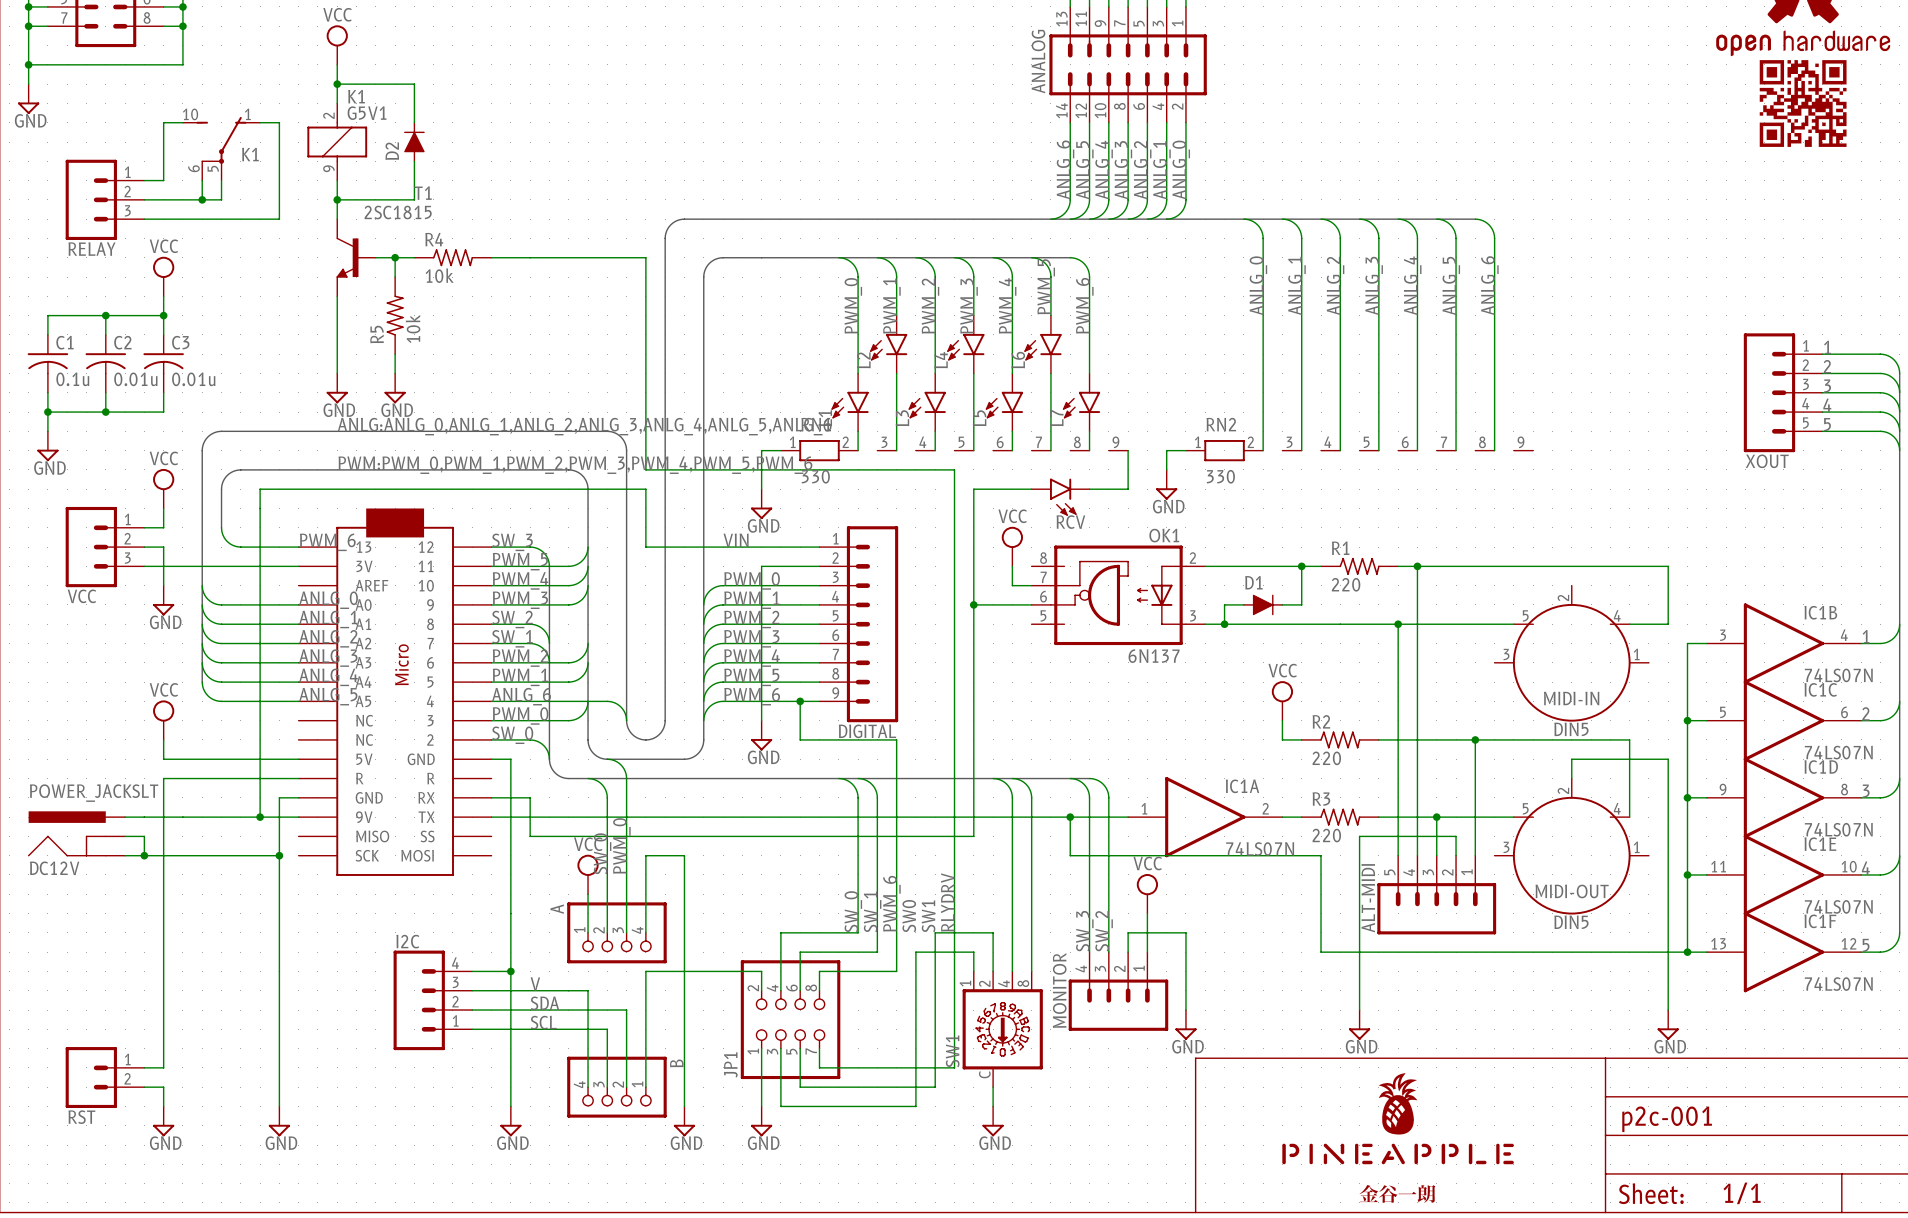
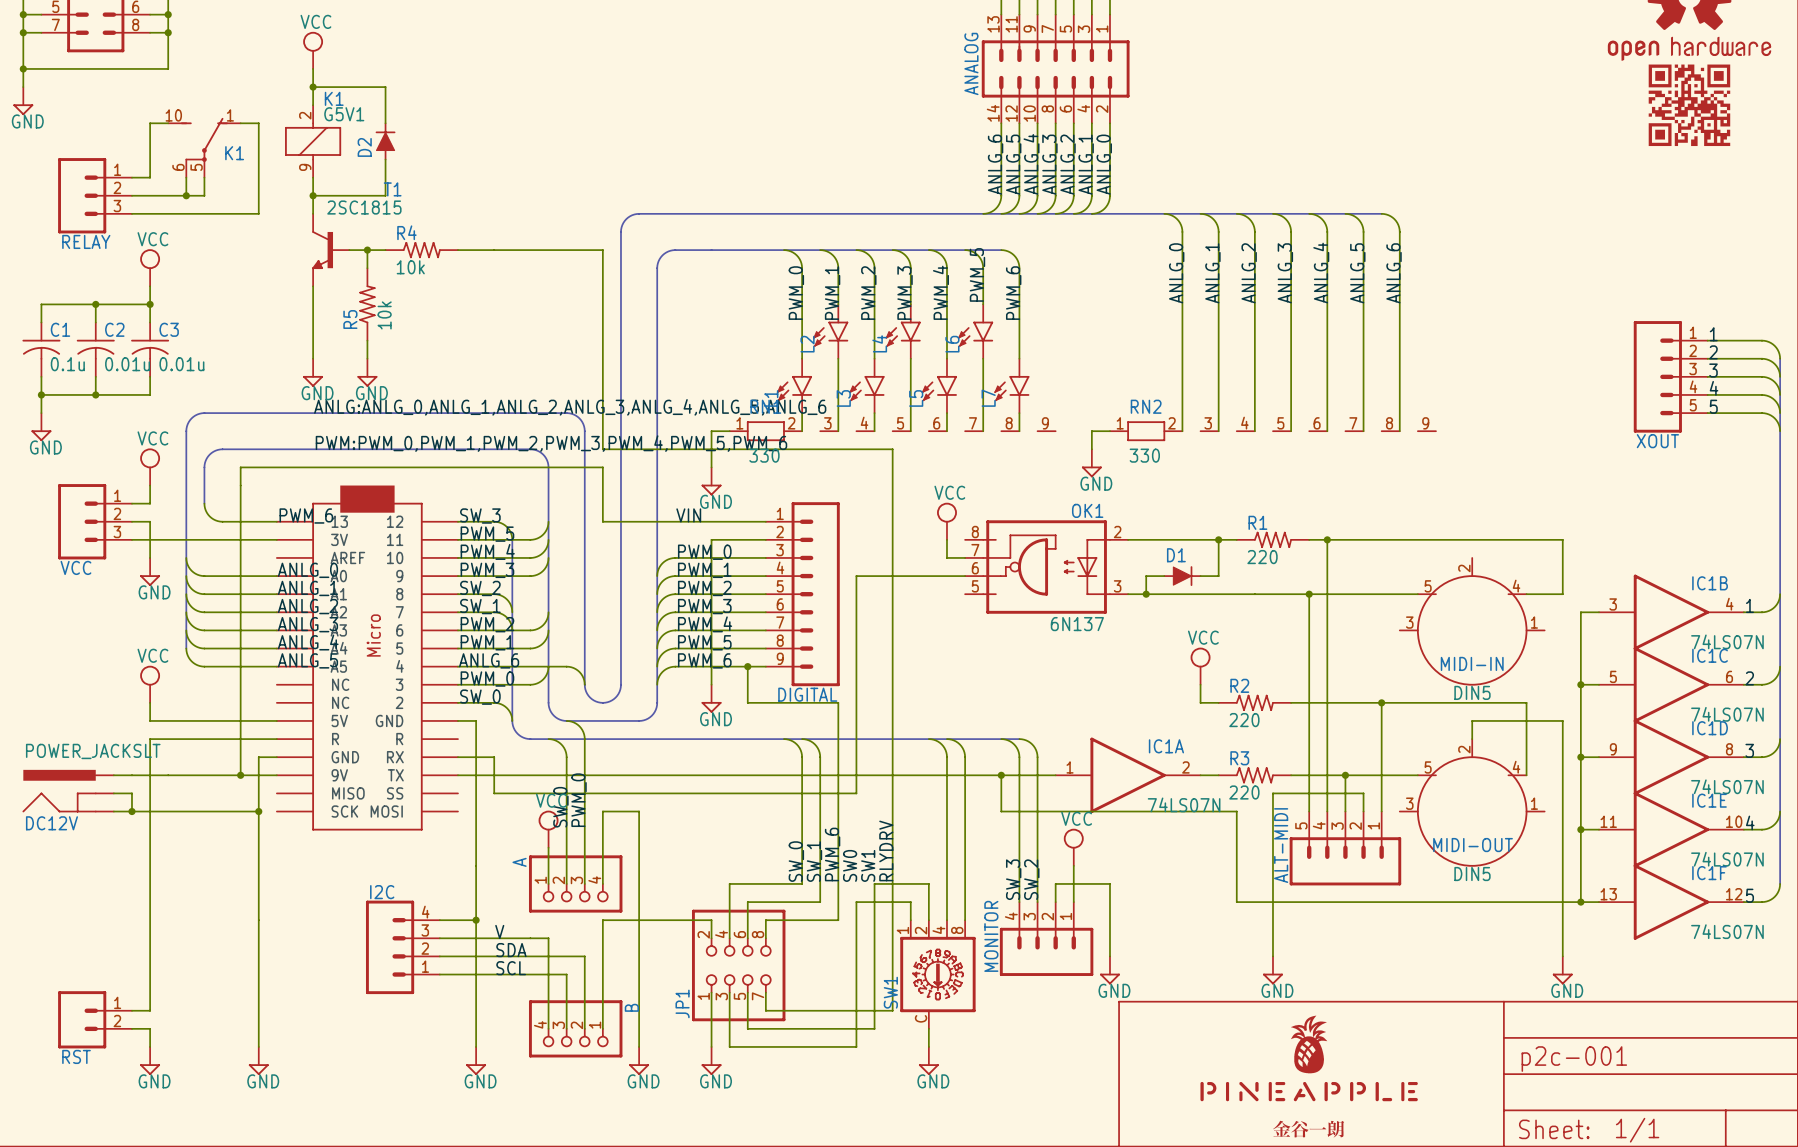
wire: (1128, 450) (1128, 489) (1089, 489) -> none
wire: (1031, 489) (973, 489) (973, 836) (915, 836) -> (910, 576) (856, 576) (856, 793)
RCV: (1060, 497) -> none
junction: (973, 604) -> none

